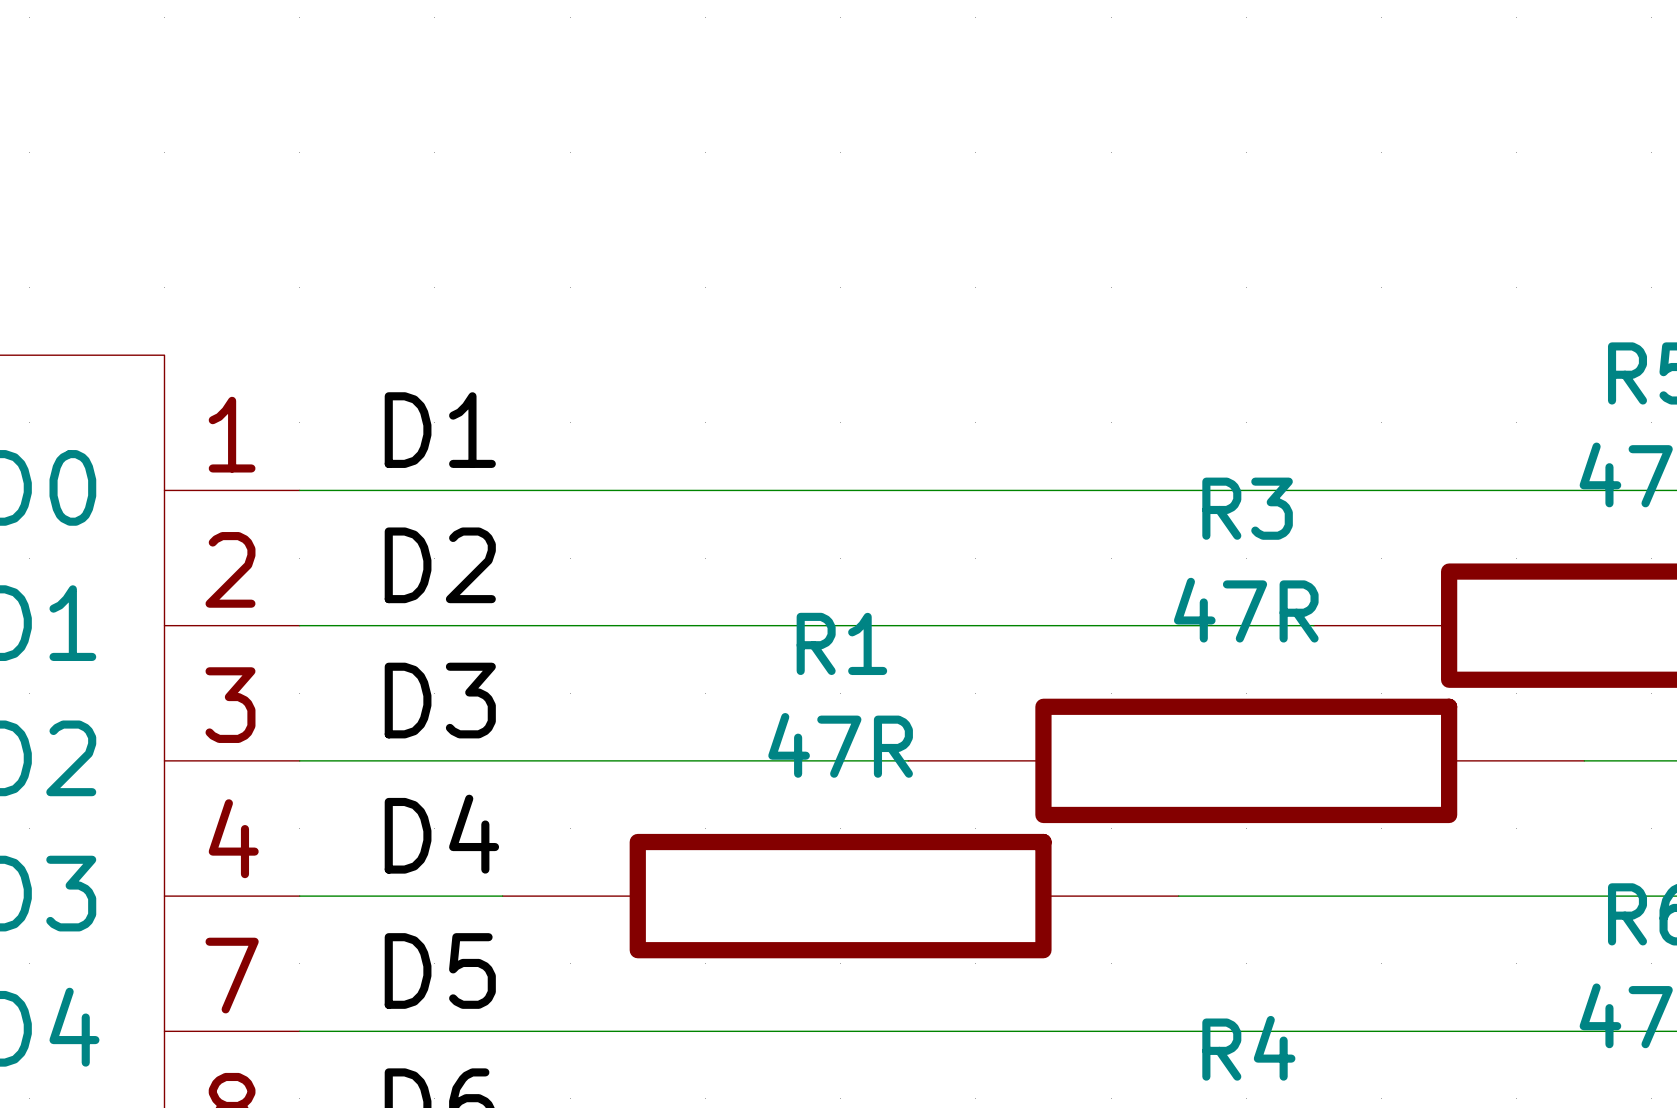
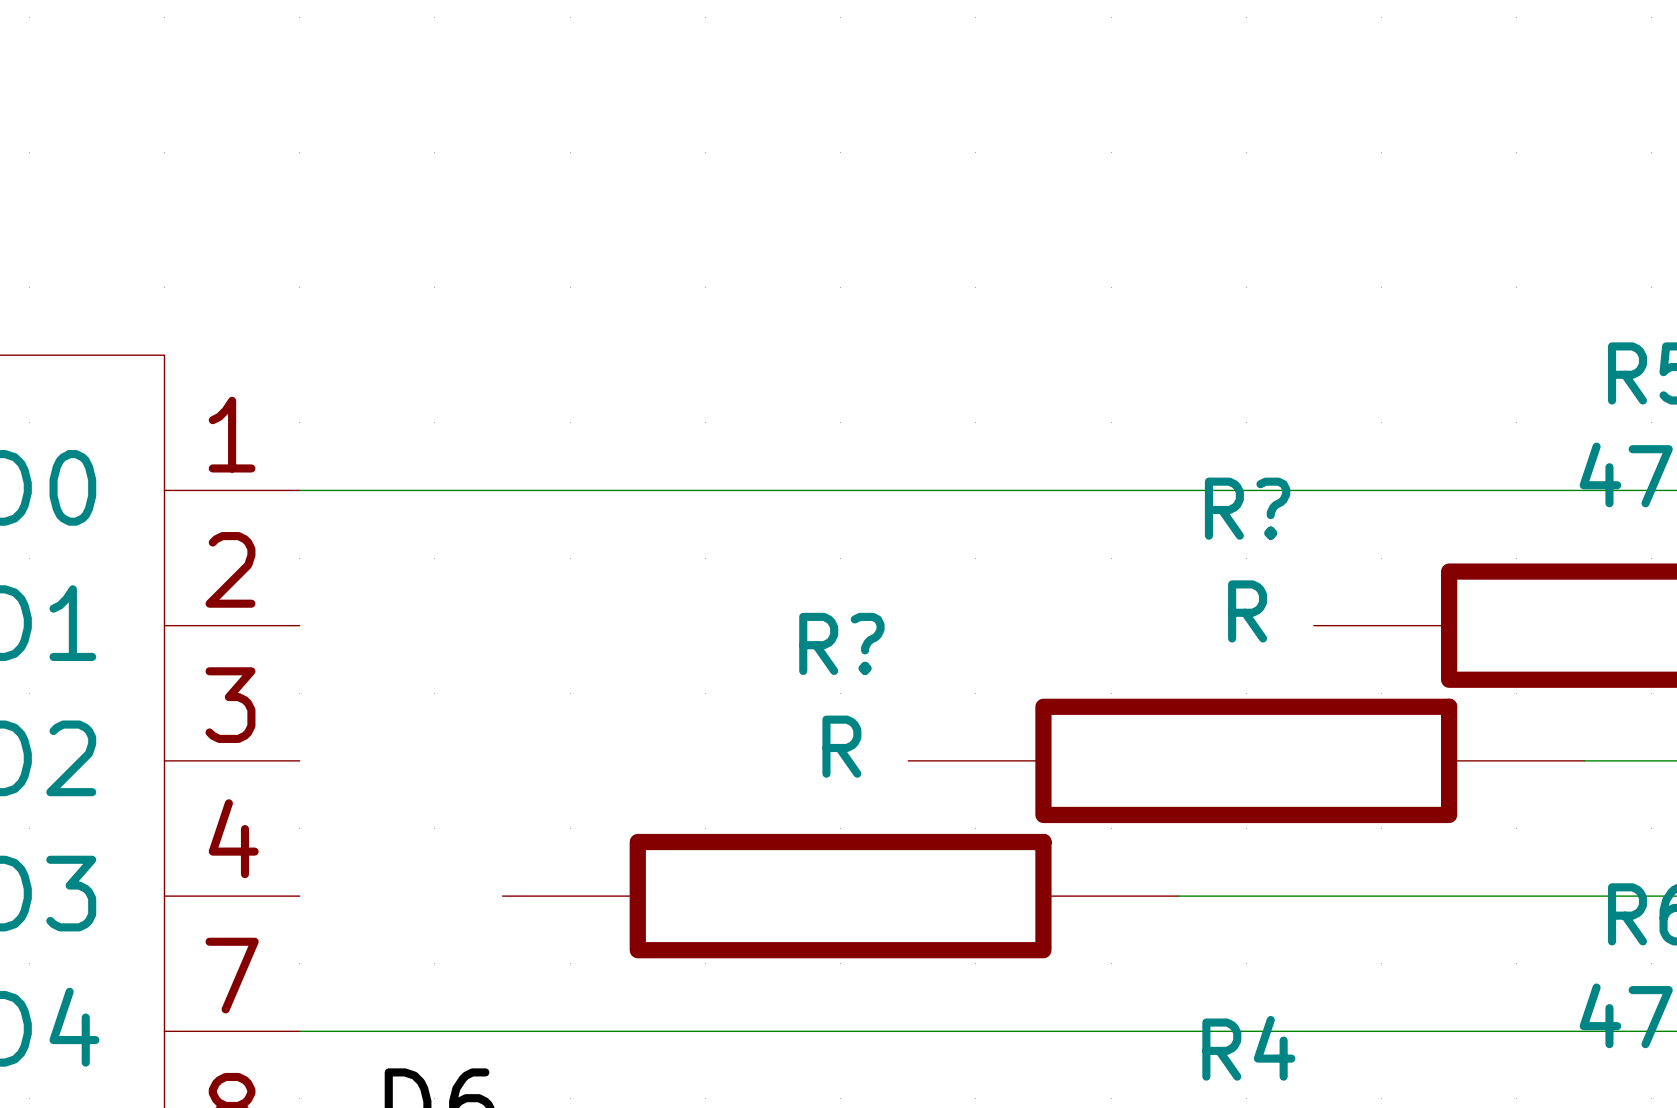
label: D1 (440, 430) -> none
R3 name: R3 (1247, 508) -> R? (1247, 508)
label: D2 (440, 565) -> none
R3 value: 47R (1246, 610) -> R (1247, 611)
wire: (299, 625) (1313, 625) -> none
R1 name: R1 (841, 643) -> R? (841, 643)
label: D3 (440, 700) -> none
R1 value: 47R (840, 745) -> R (841, 746)
wire: (299, 760) (908, 760) -> none
label: D4 (441, 834) -> none
wire: (299, 896) (502, 896) -> none
label: D5 (440, 970) -> none

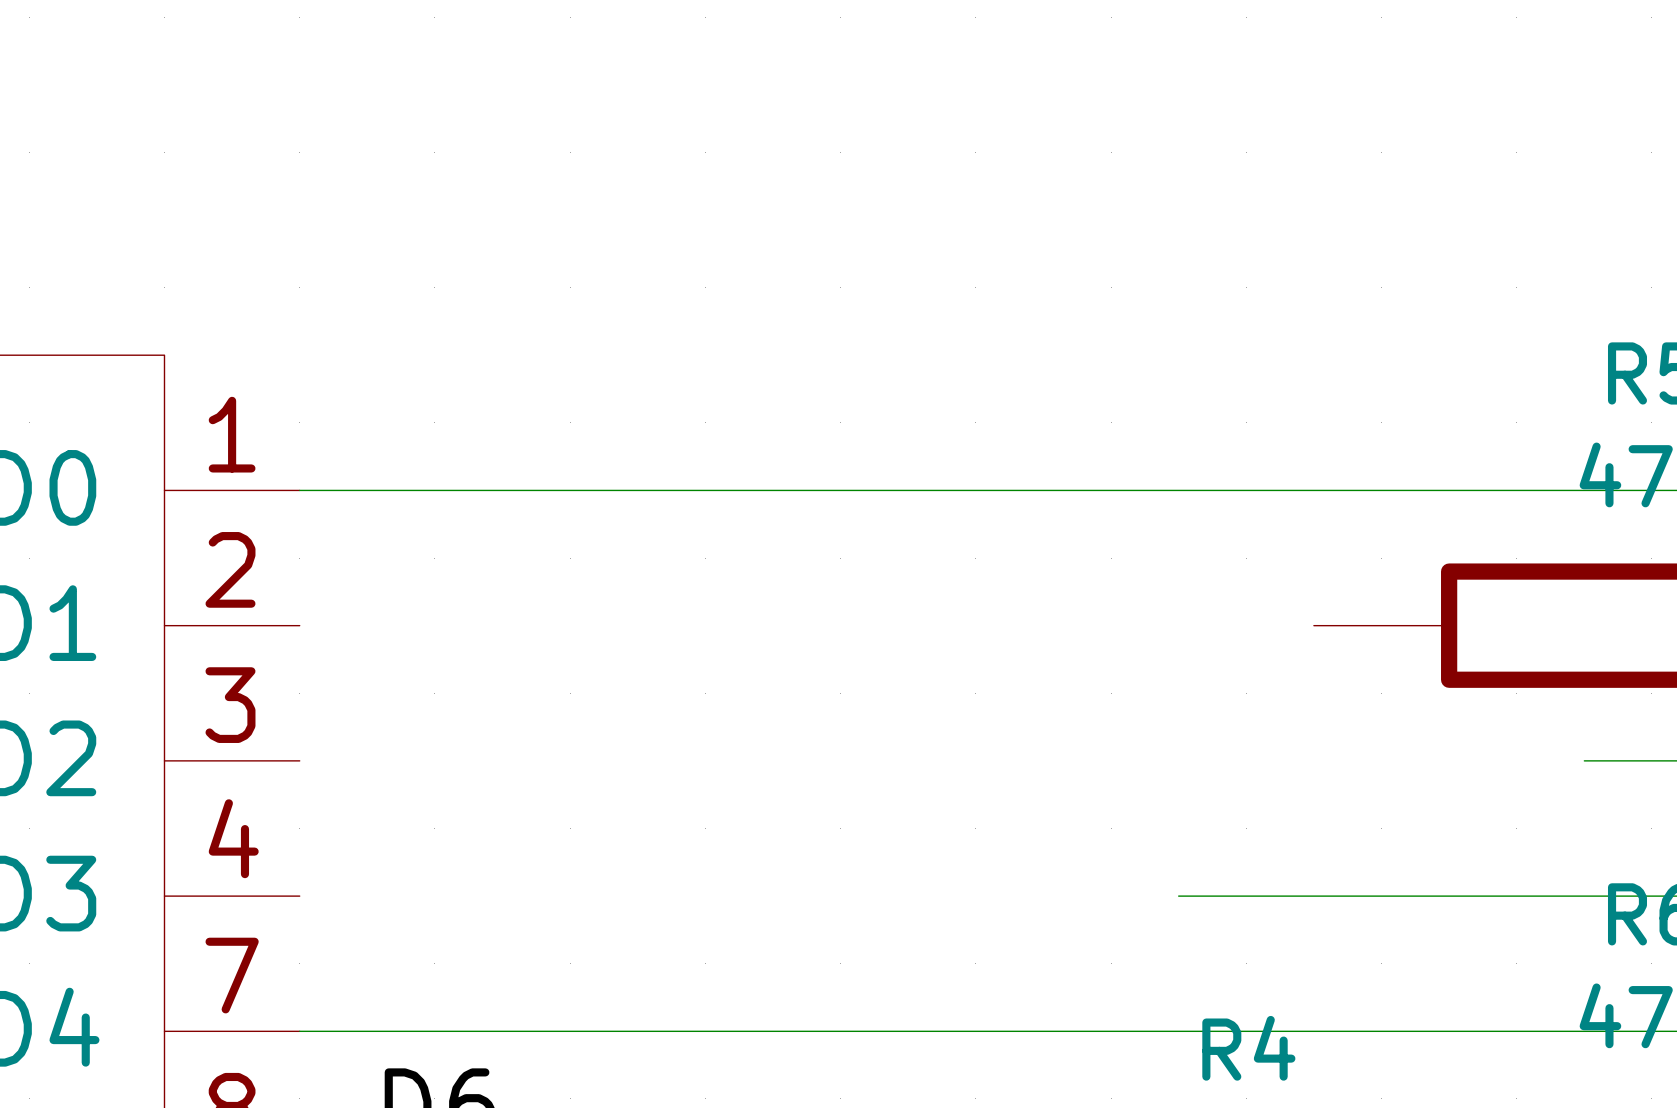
R?: R (1246, 760) -> none
R?: R (840, 896) -> none

